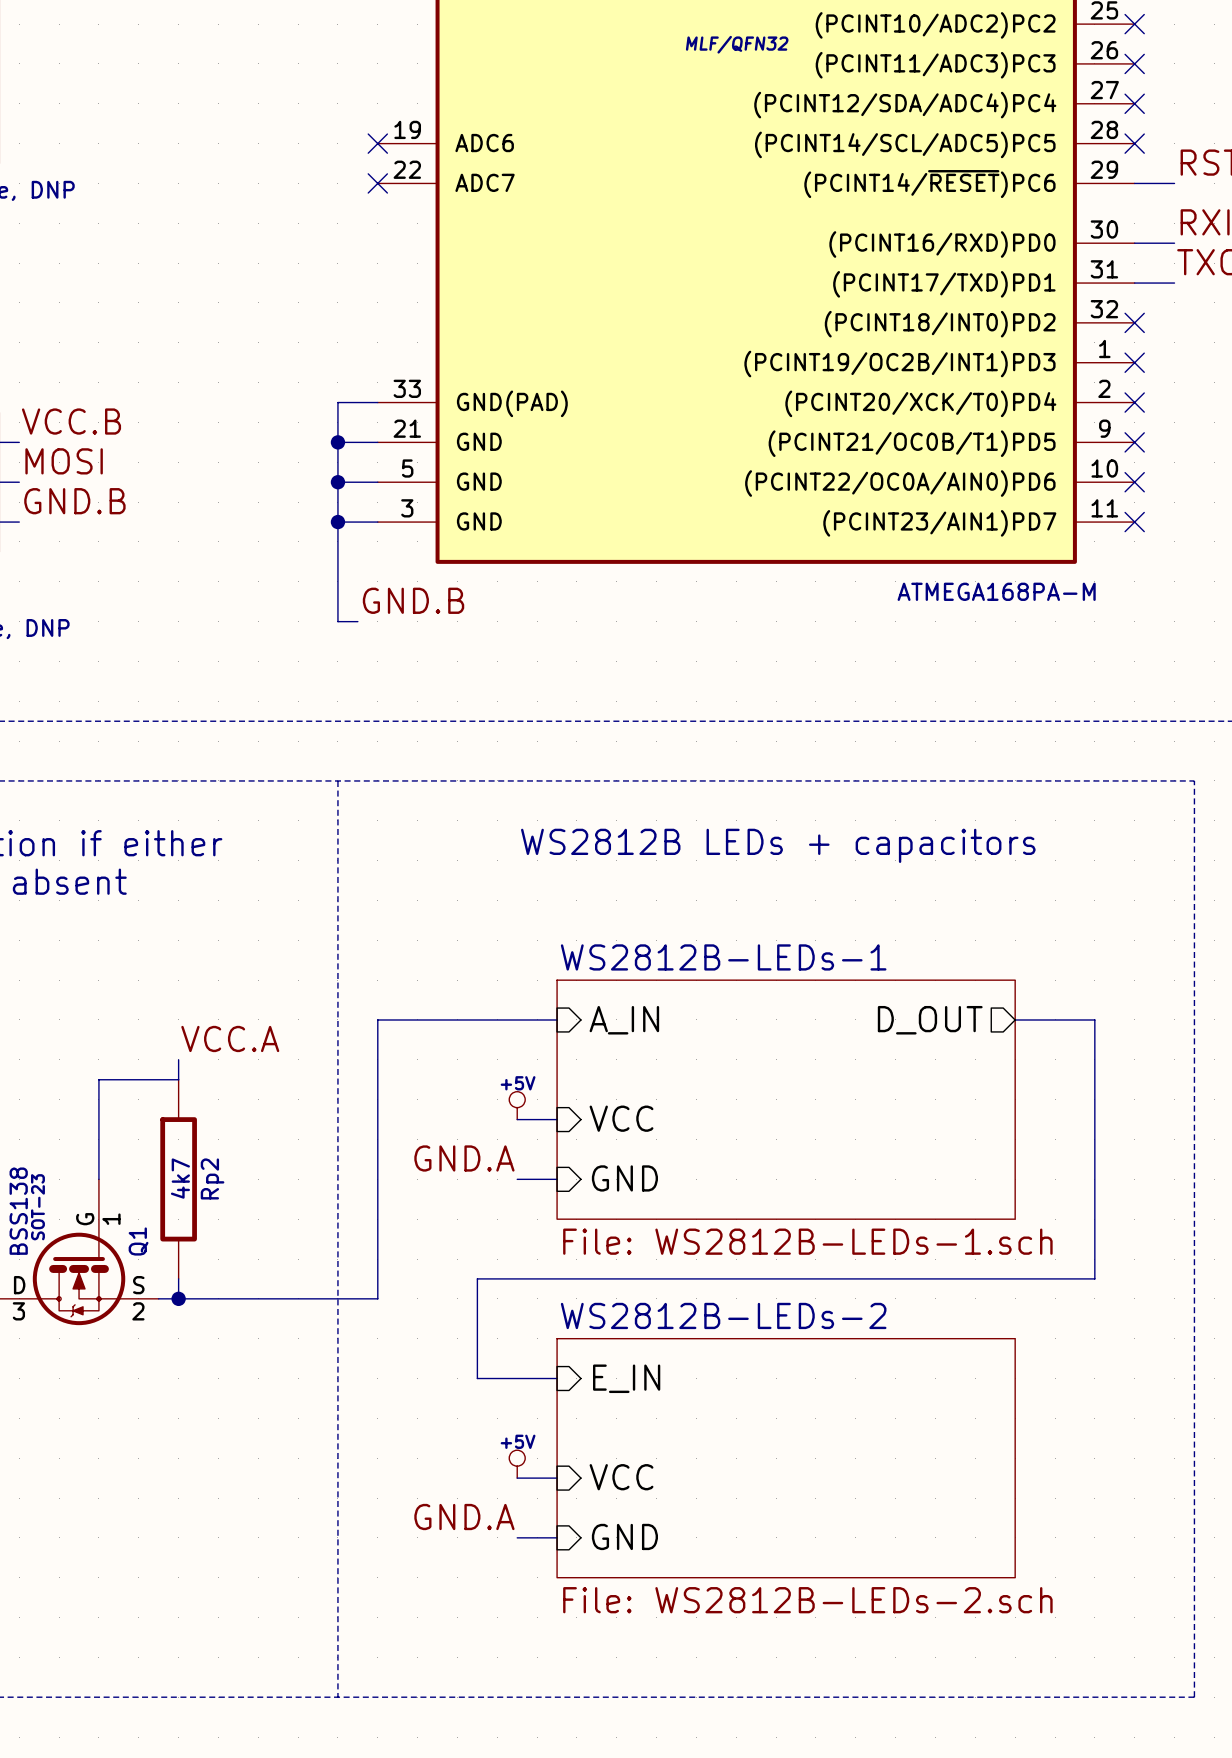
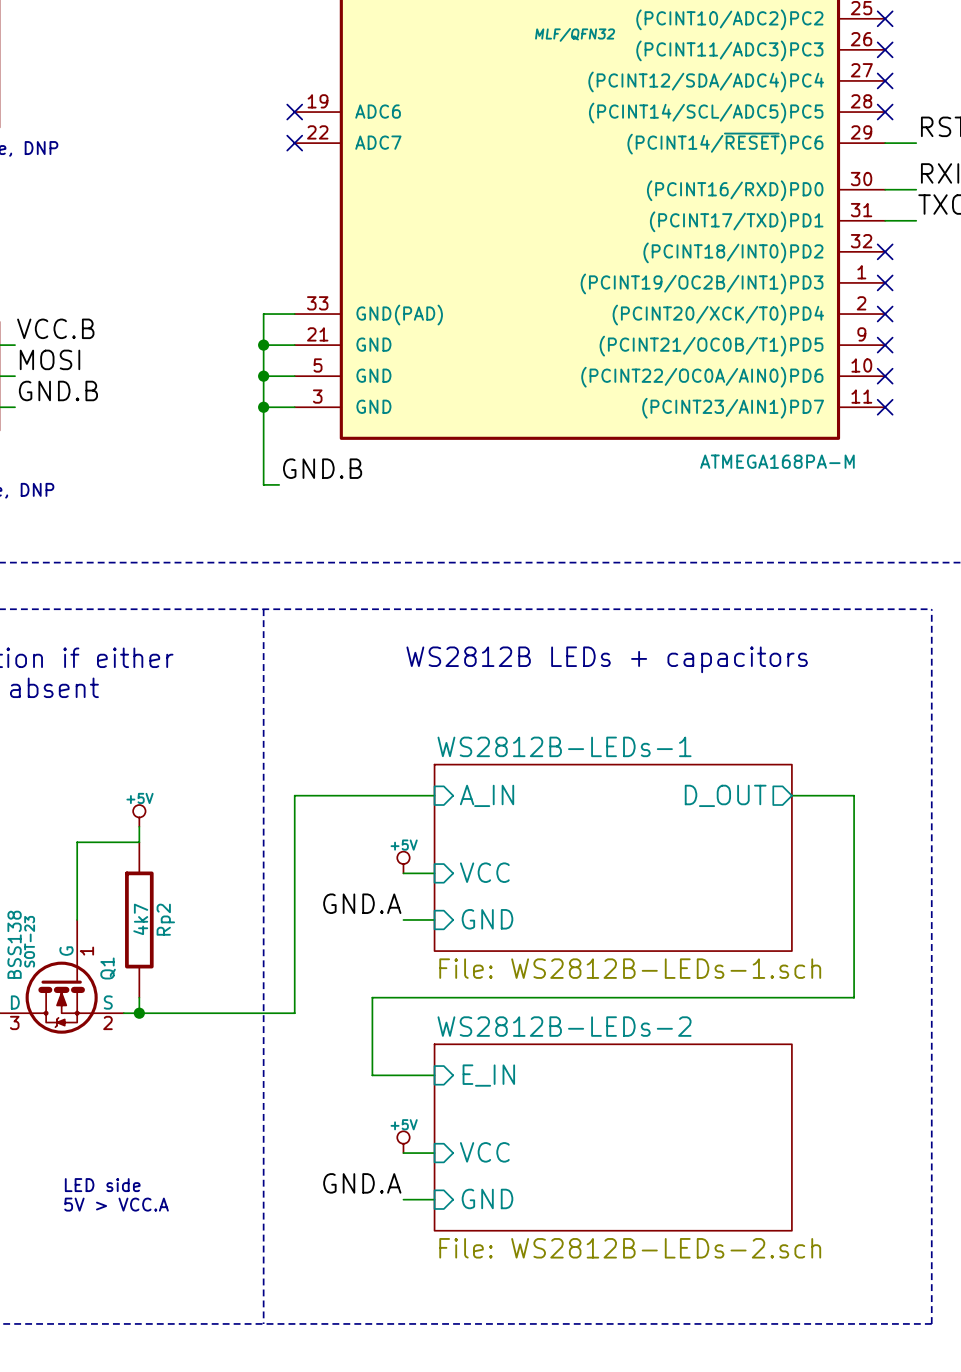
label: VCC.A (230, 1038) -> none
power symbol: none -> +5V (139, 815)
text: none -> LED side (102, 1185)
text: none -> 5V > VCC.A (116, 1204)

